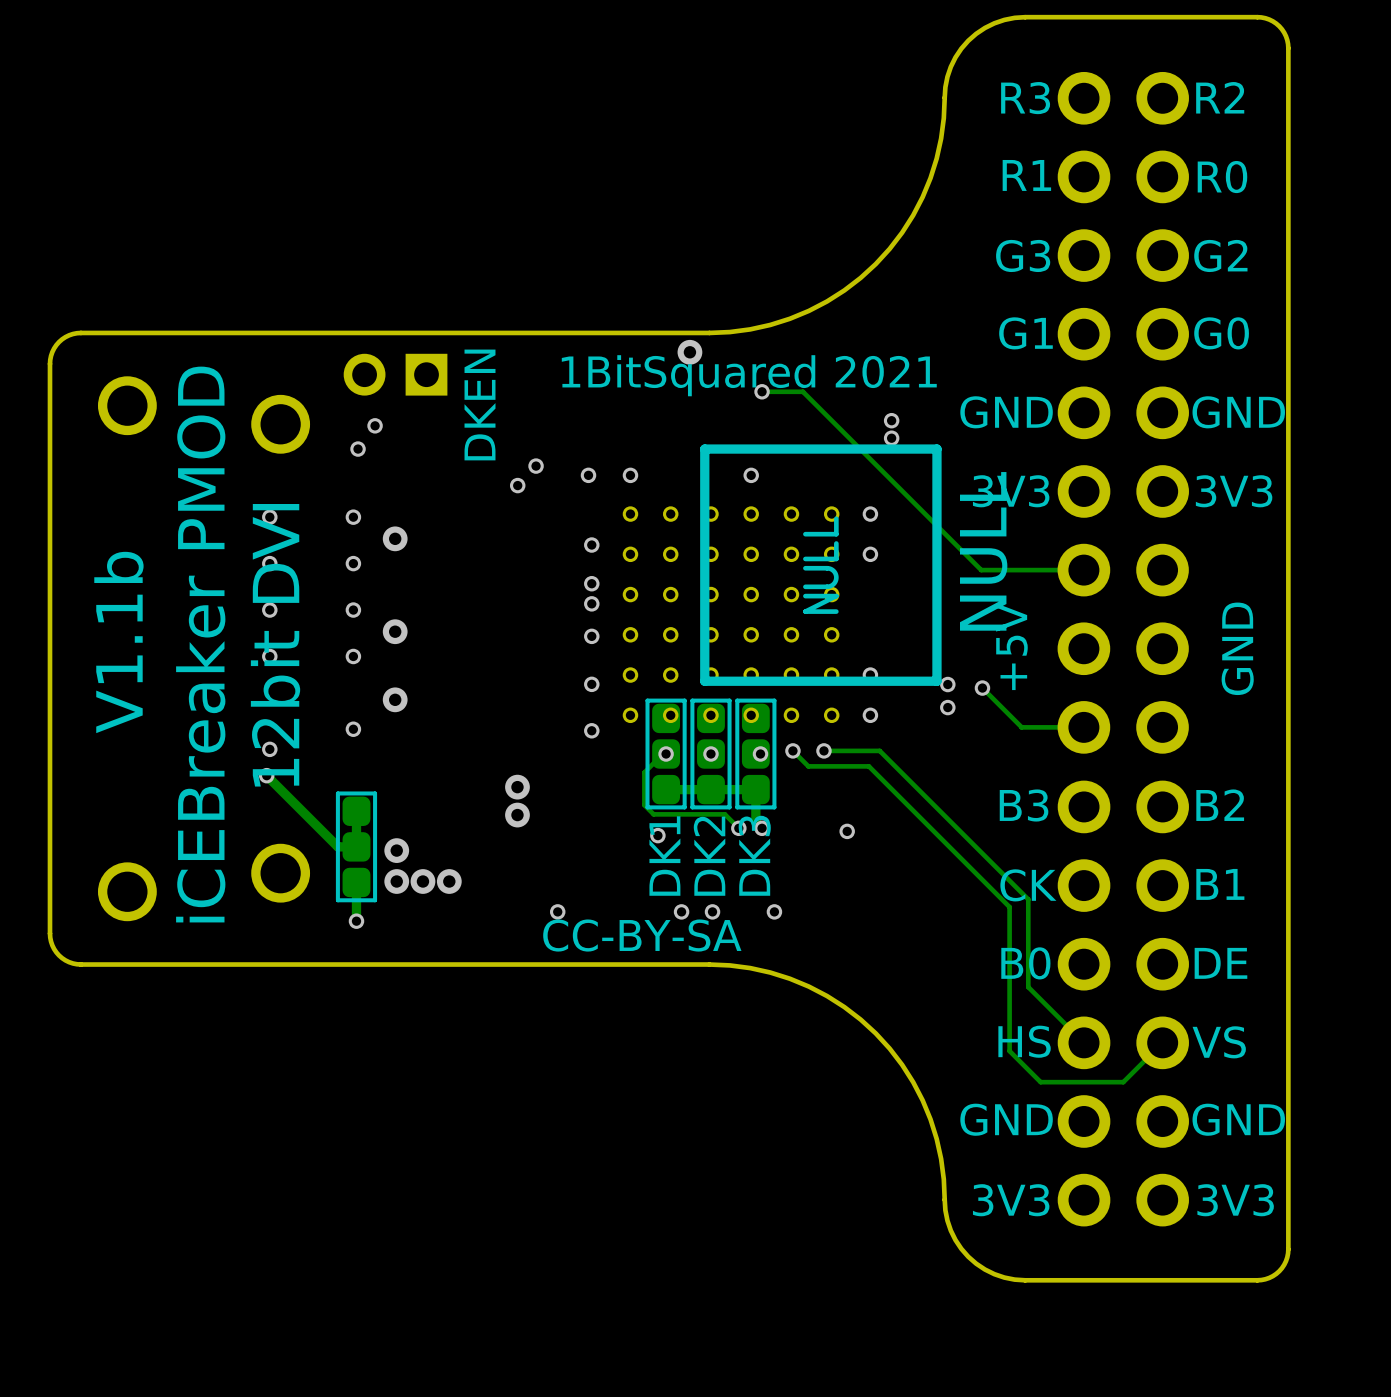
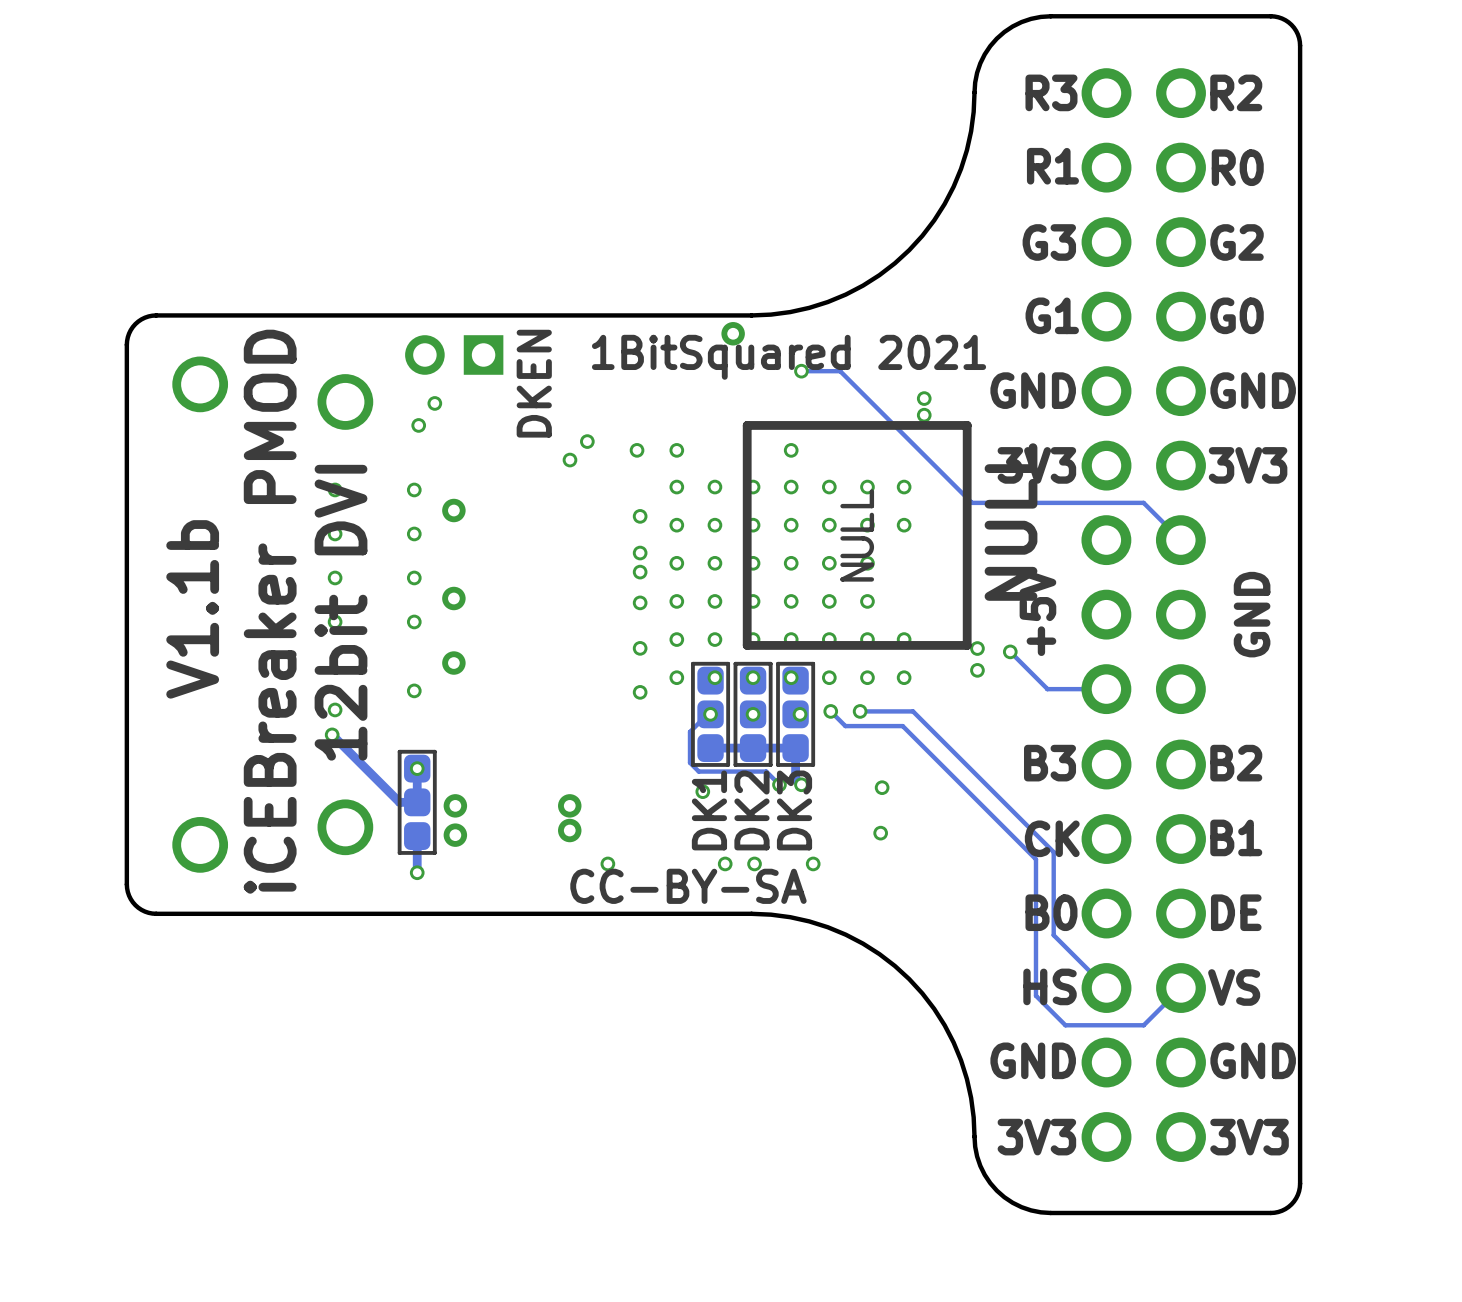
track: (941, 530) (981, 570) (1083, 570) -> (971, 502) (1143, 502) (1180, 540)
via: (517, 787) -> none
via: none -> (417, 768)
via: (517, 815) -> none
via: none -> (569, 805)
via: none -> (569, 830)
via: none -> (880, 833)
via: (422, 881) -> none
via: (449, 881) -> none

